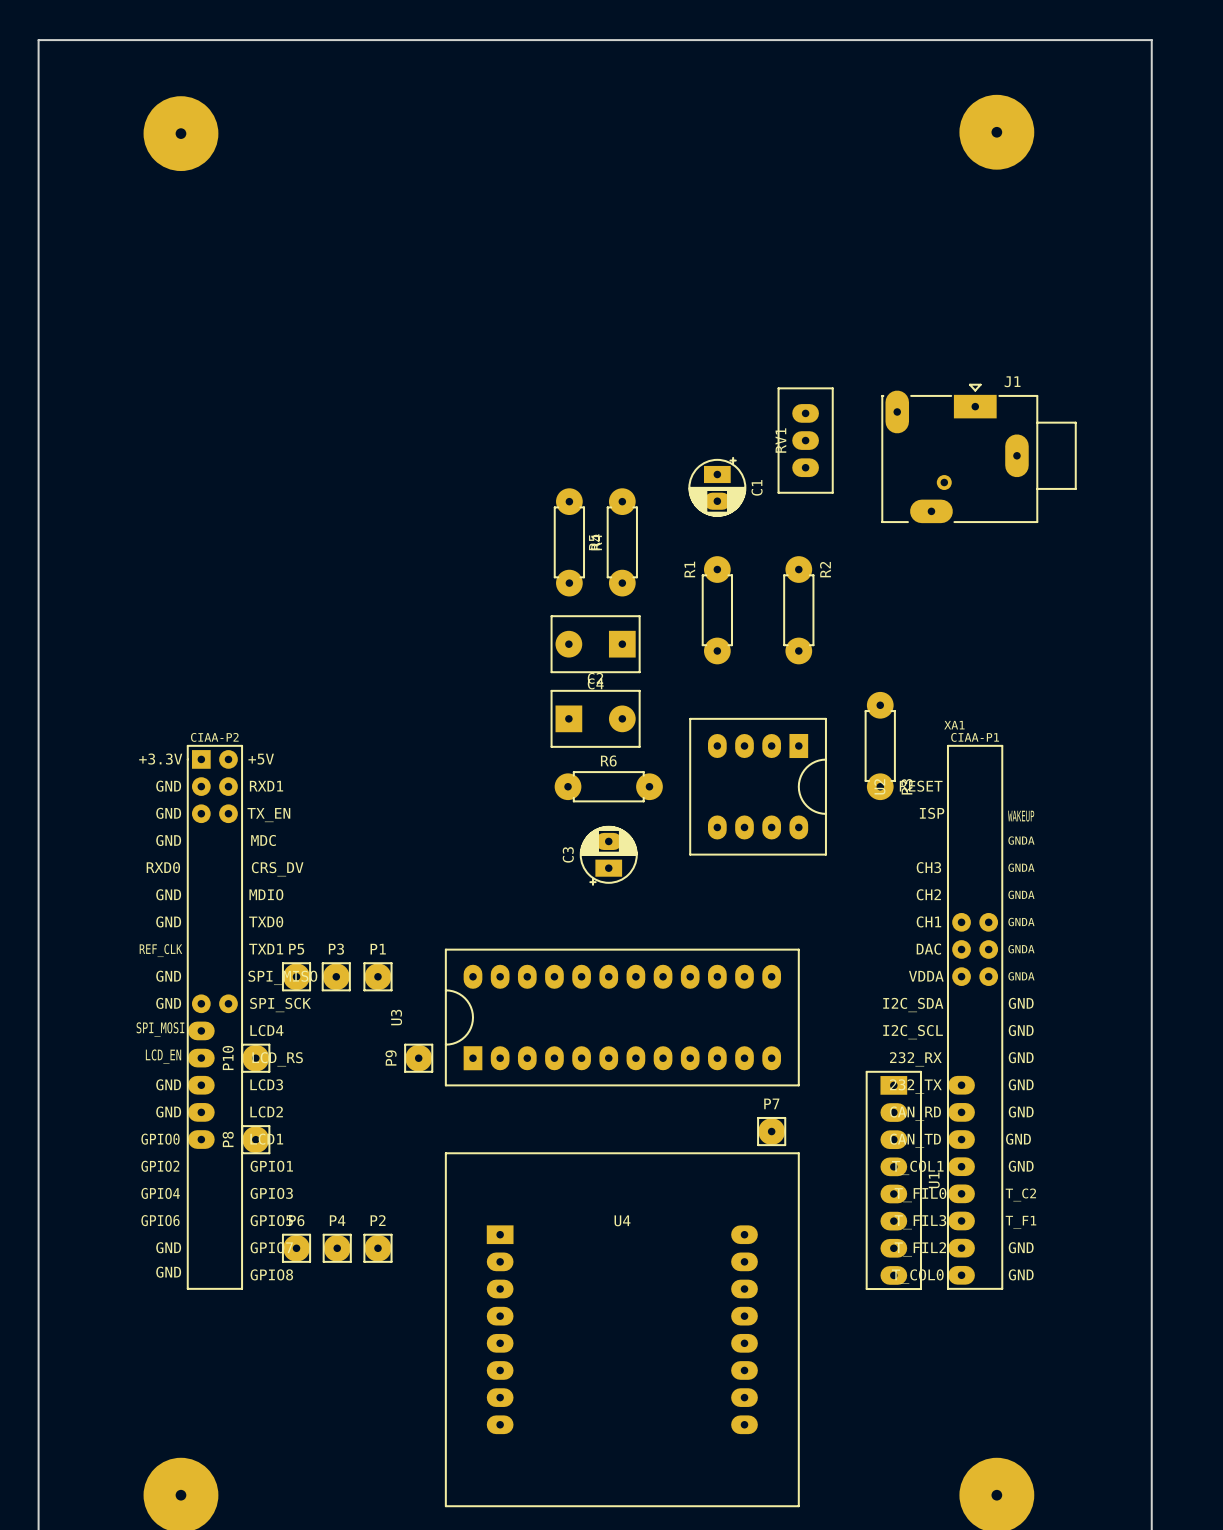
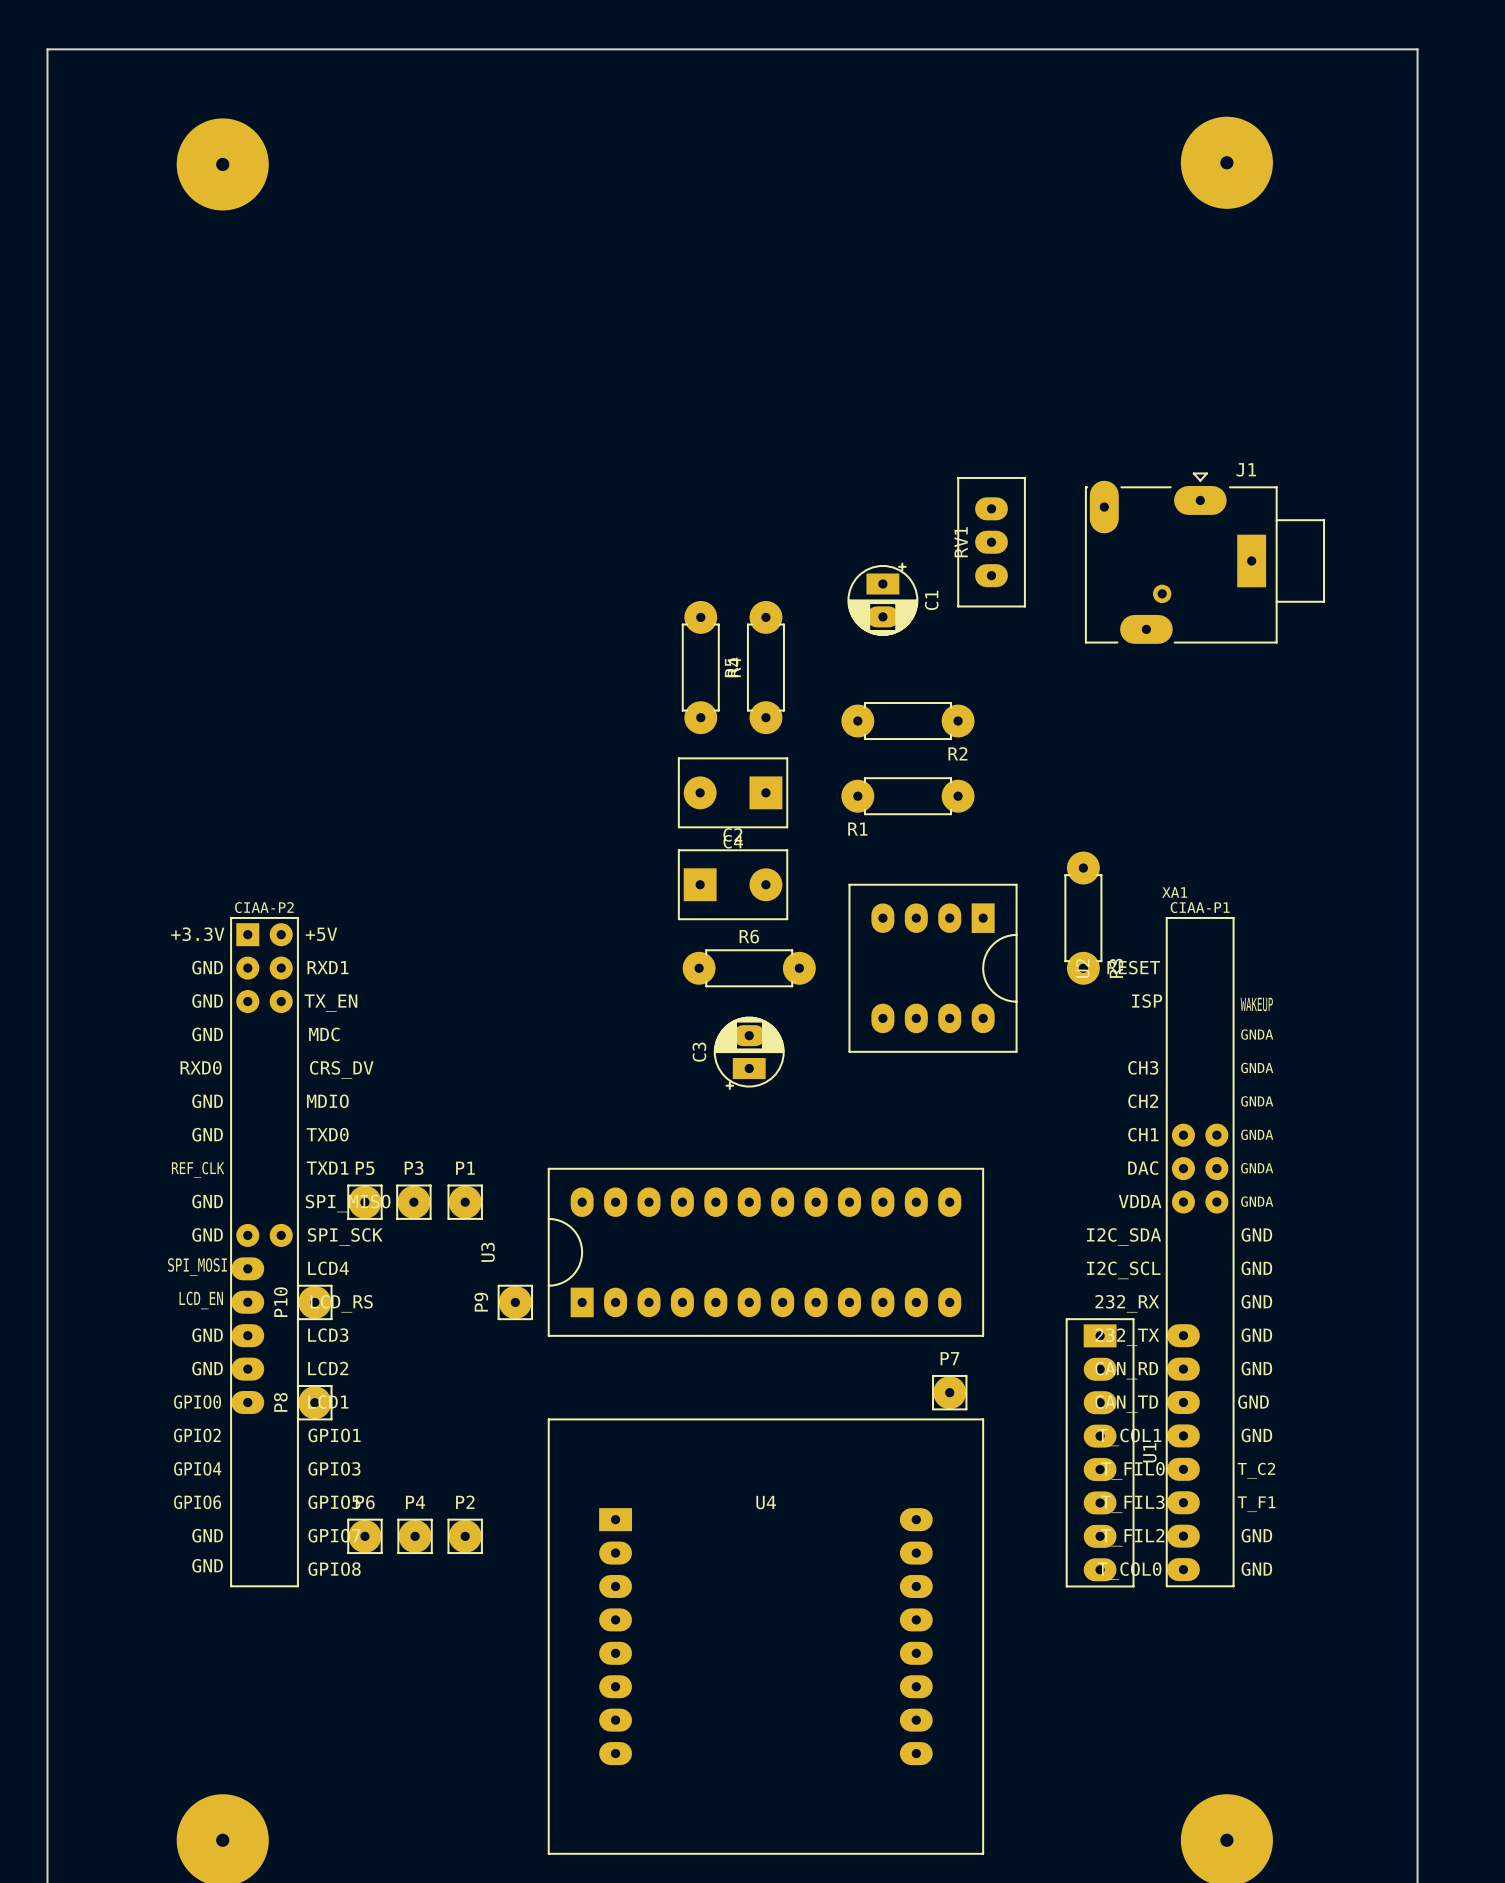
J1 footprint: [881, 384, 1077, 524] -> [1084, 472, 1326, 644]
R1 name position: R1 (689, 569) -> R1 (857, 829)
R1 rotation: 0° (717, 610) -> 90° clockwise (907, 796)
R2 rotation: 0° (798, 610) -> 90° clockwise (907, 721)
R2 position: (798, 610) -> (907, 721)

